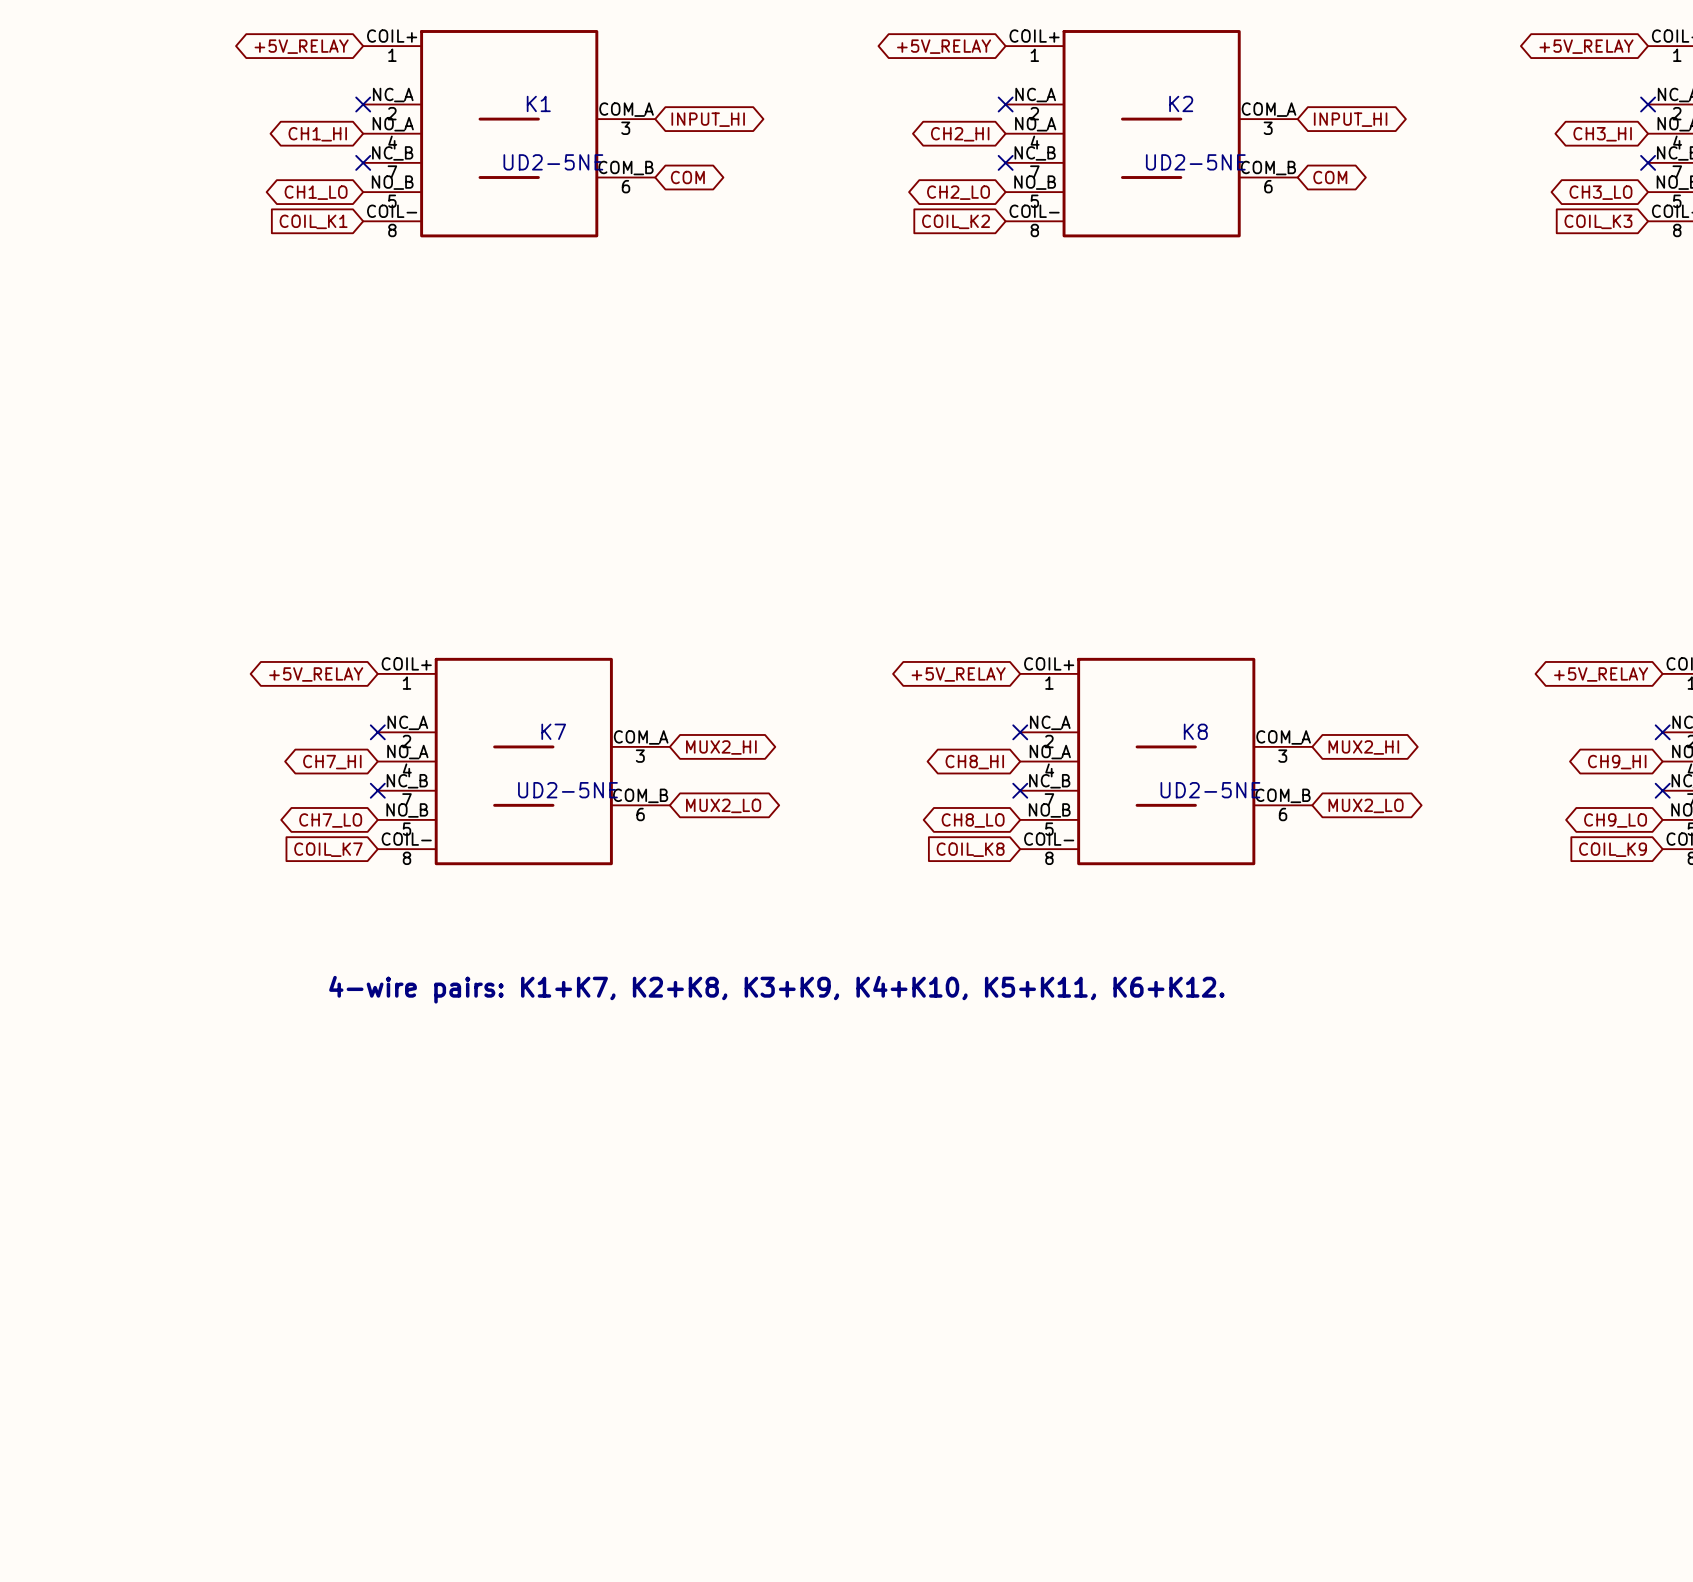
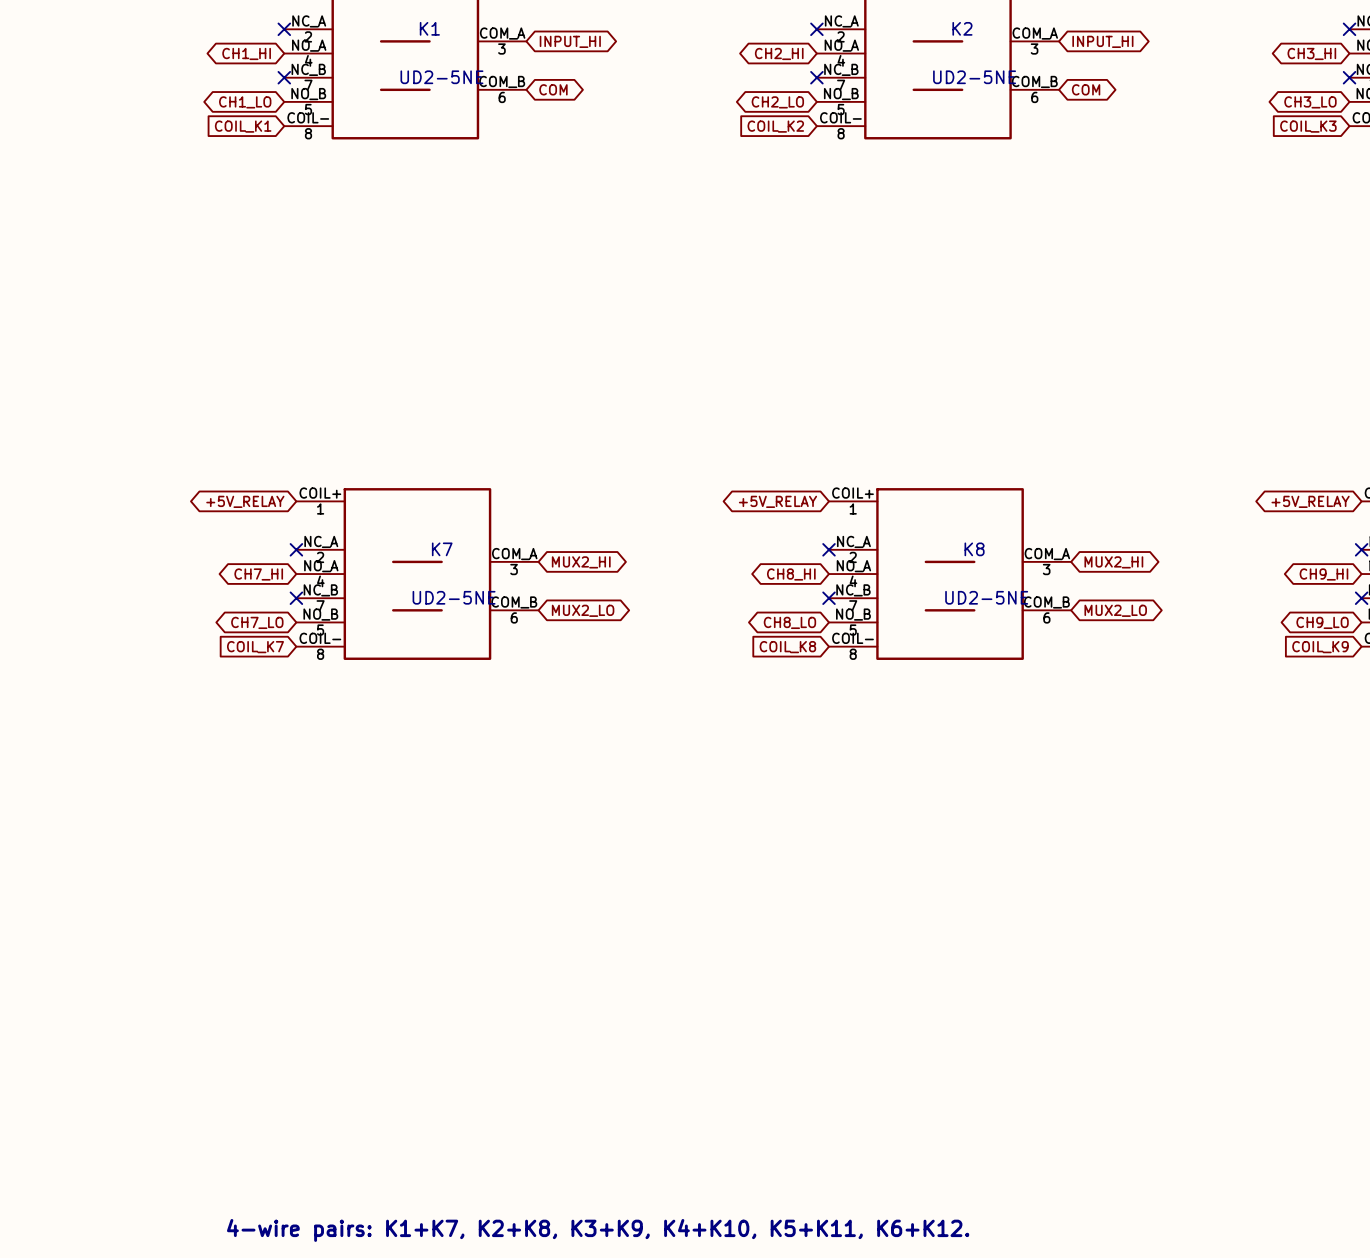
text: 4-wire pairs: K1+K7, K2+K8, K3+K9, K4+K10, K5+K11, K6+K12. (776, 989) -> none
text: none -> 4-wire pairs: K1+K7, K2+K8, K3+K9, K4+K10, K5+K11, K6+K12. (598, 1230)

